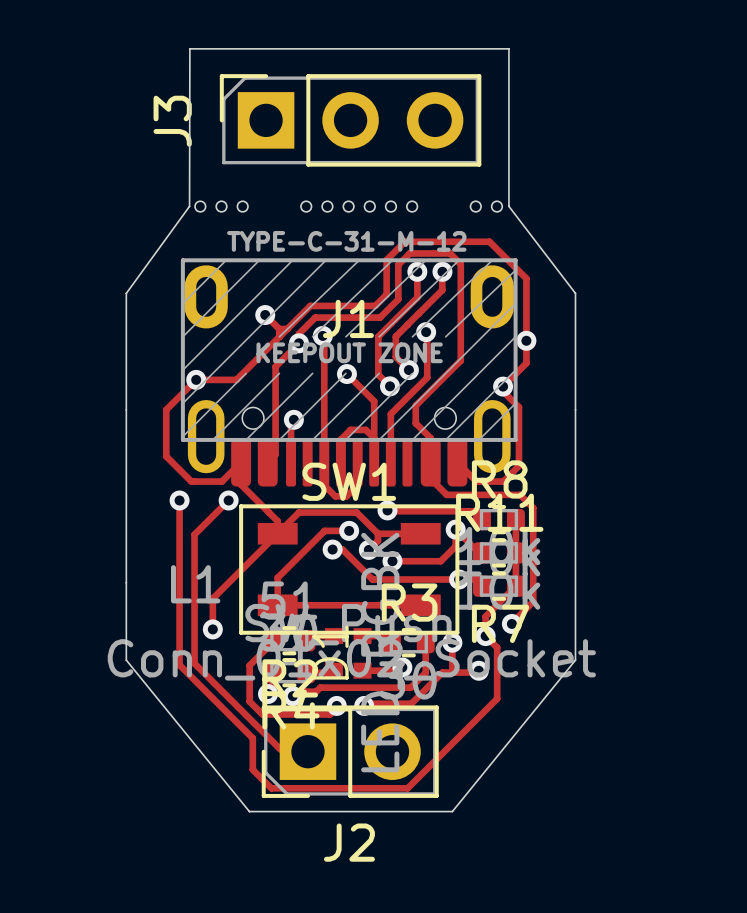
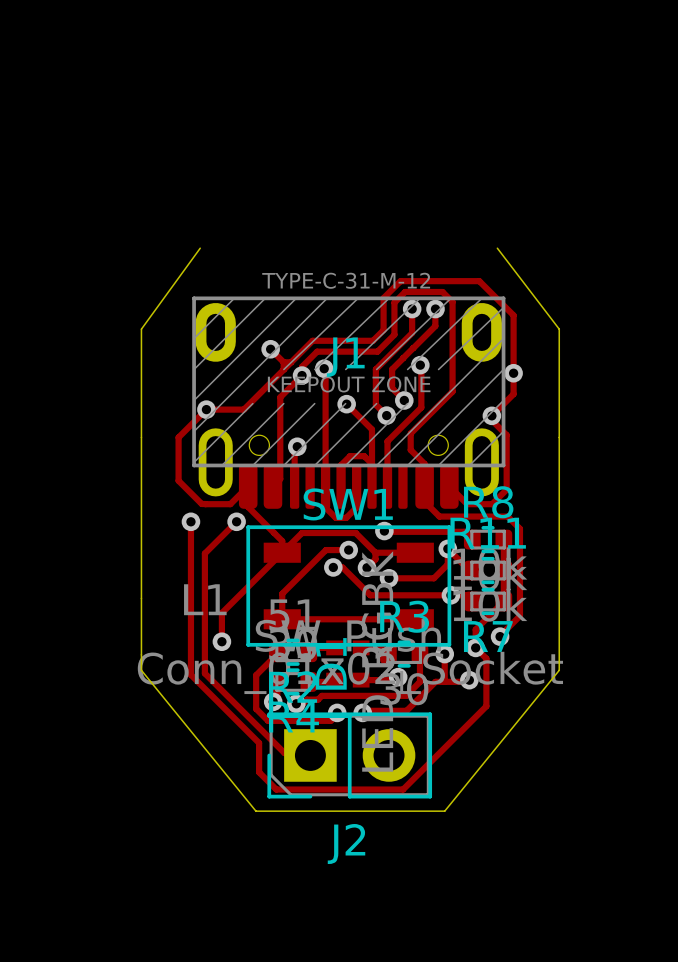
J3: (350, 120) -> none
round board edge: [194, 200, 207, 213] -> none
round board edge: [215, 200, 228, 213] -> none
round board edge: [236, 200, 249, 213] -> none
round board edge: [300, 200, 313, 213] -> none
round board edge: [321, 200, 334, 213] -> none
round board edge: [342, 200, 355, 213] -> none
round board edge: [363, 200, 376, 213] -> none
round board edge: [384, 200, 398, 213] -> none
round board edge: [406, 200, 419, 213] -> none
round board edge: [469, 200, 482, 213] -> none
round board edge: [490, 200, 504, 213] -> none
board edge: (189, 206) (189, 48) (508, 48) (508, 206) -> none

